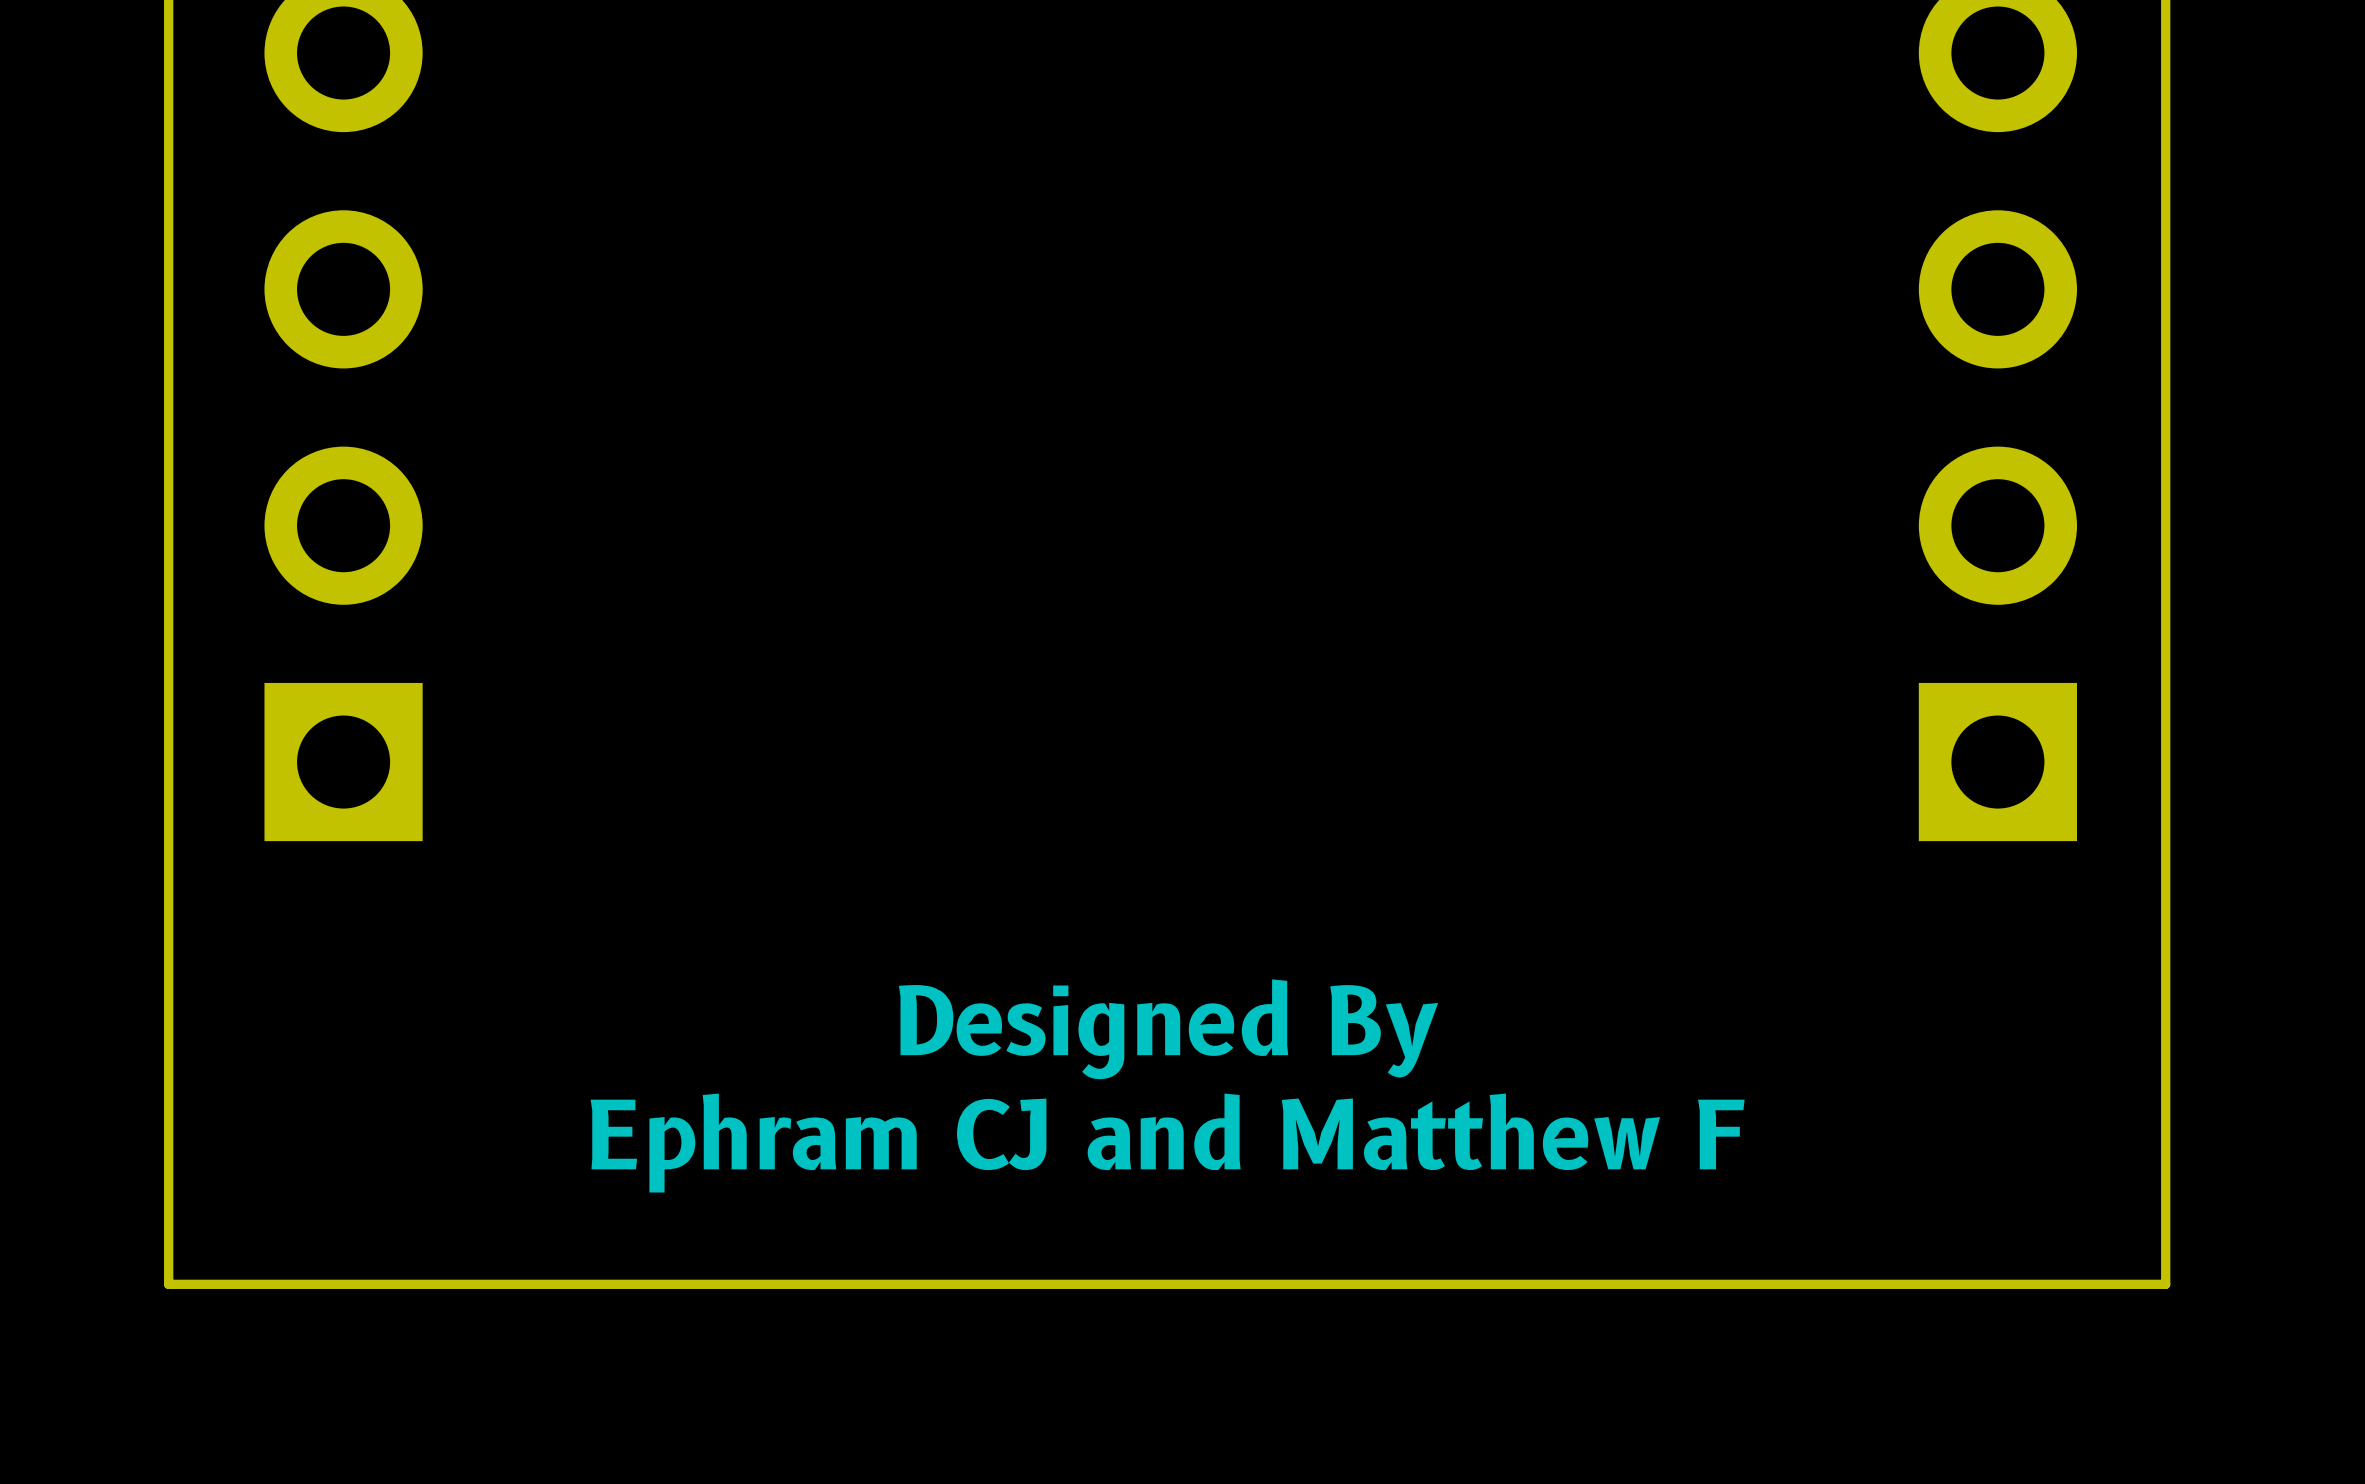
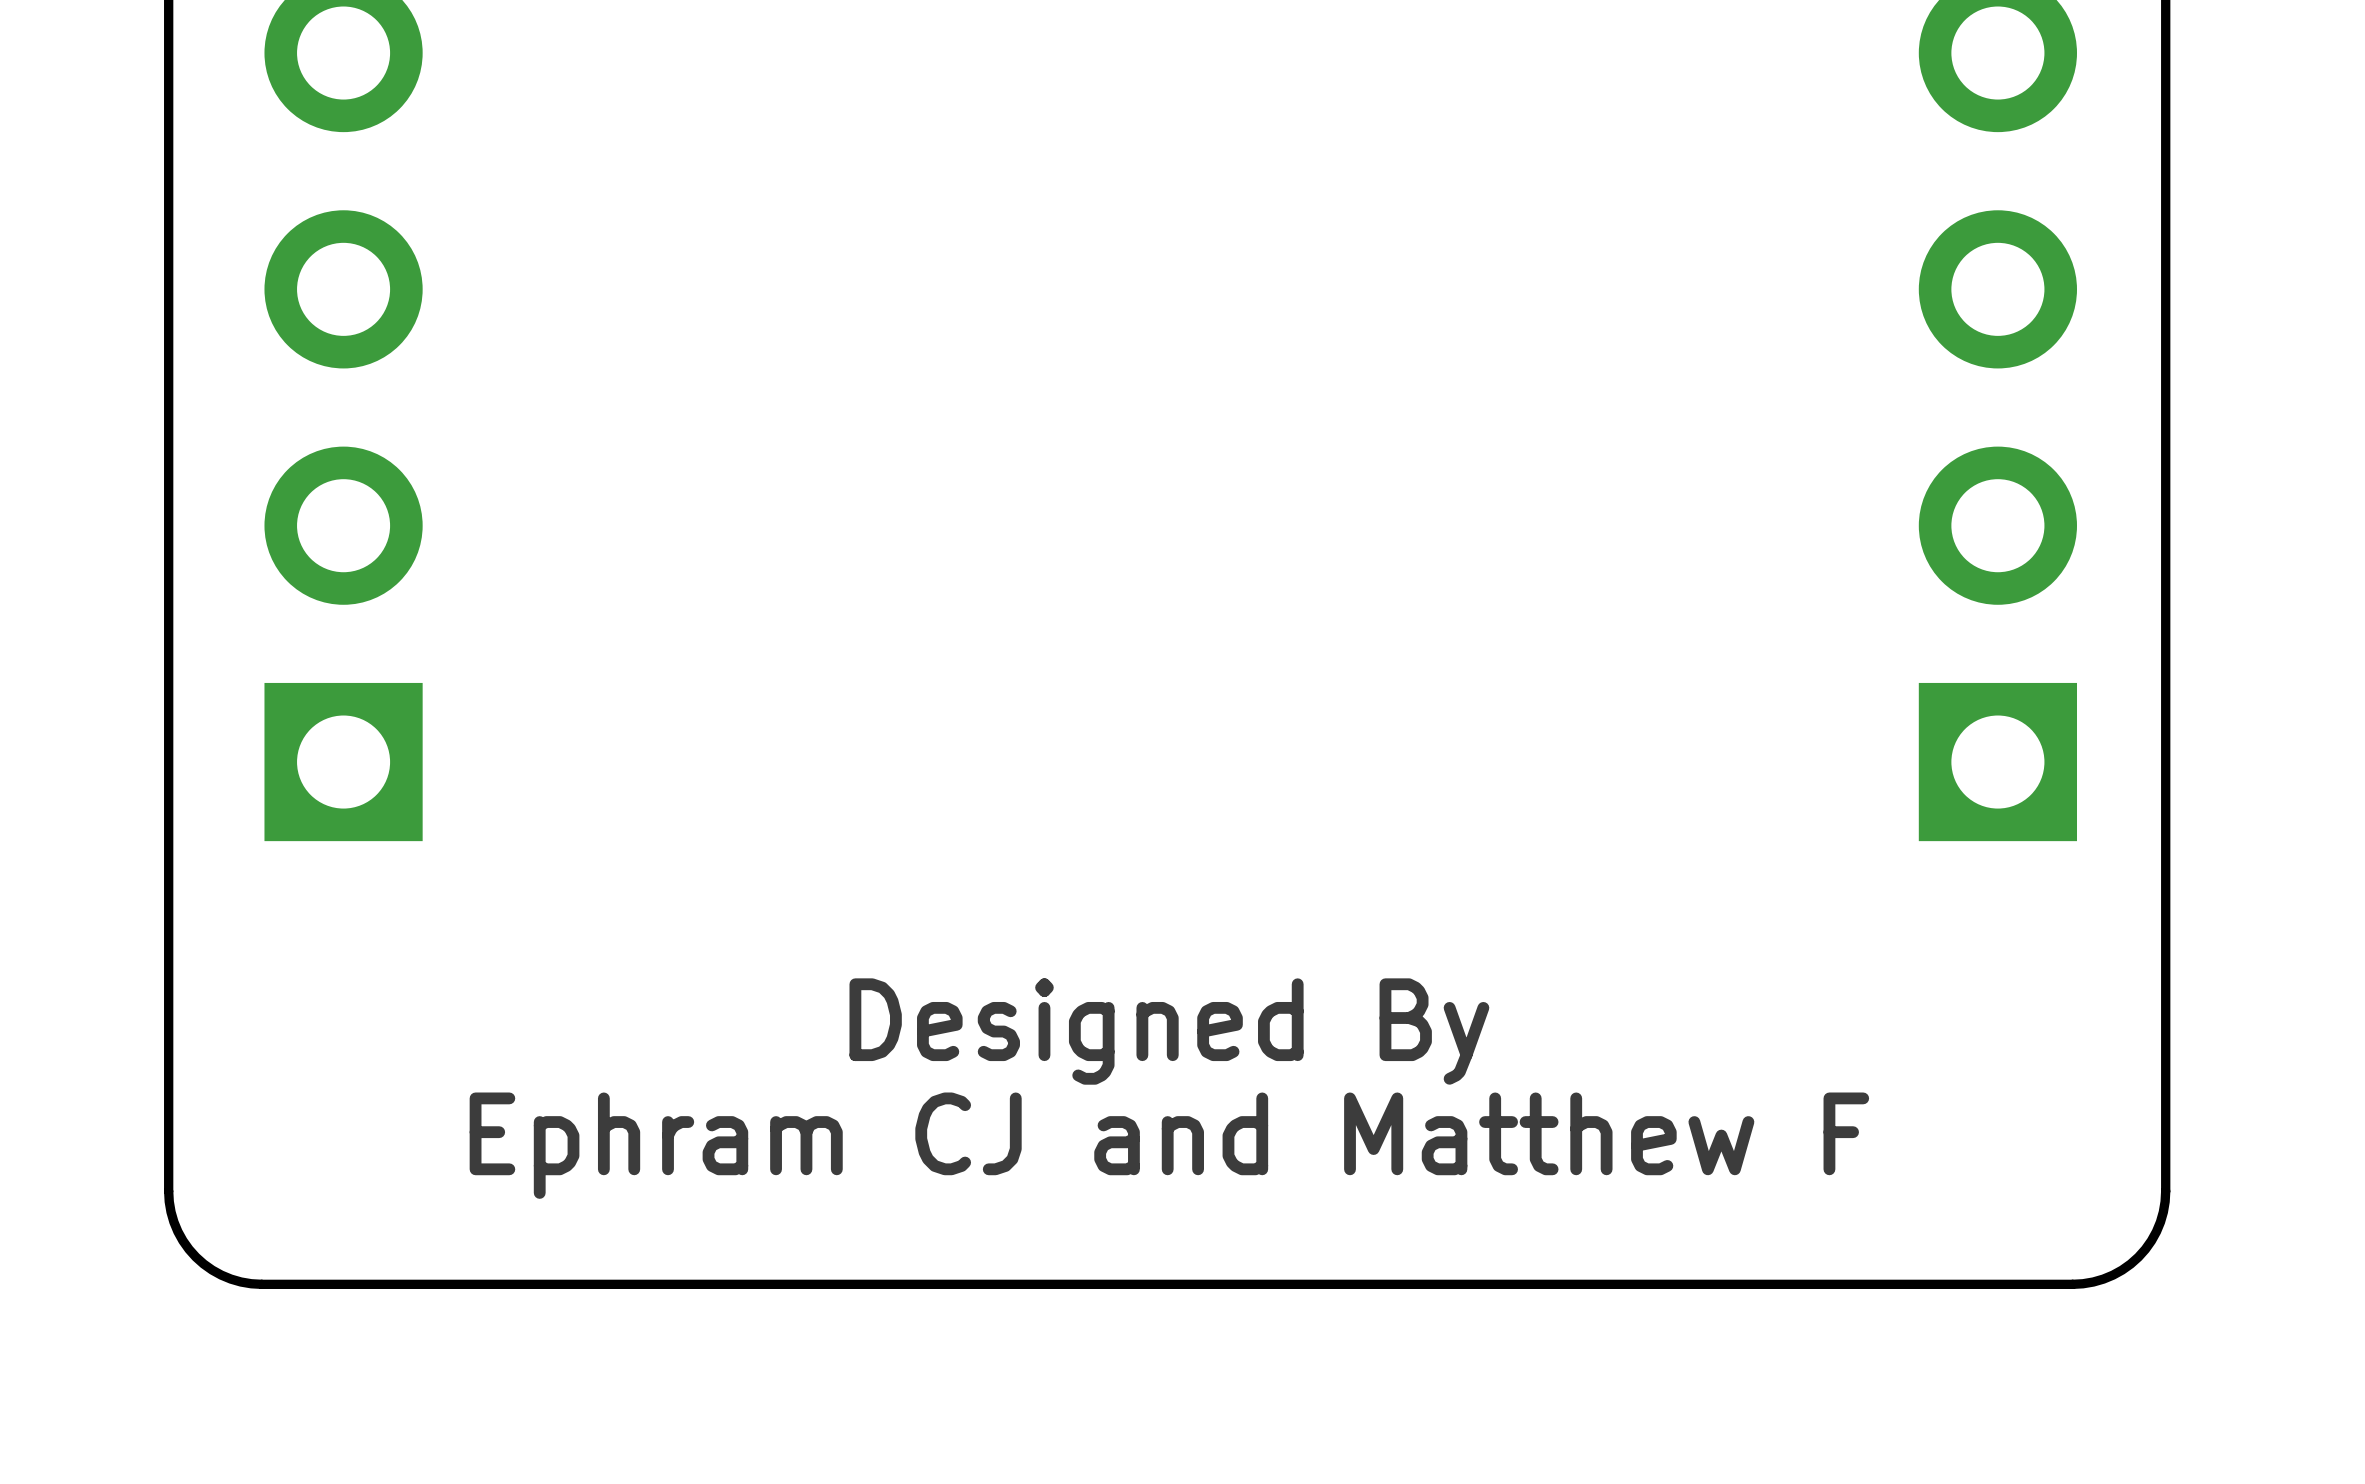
board edge: (168, 1191) (168, 1284) (261, 1284) -> (168, 1191) (173, 1222) (182, 1240) (195, 1257) (212, 1270) (230, 1279) (261, 1284)
board edge: (2165, 1191) (2165, 1284) (2072, 1284) -> (2165, 1191) (2163, 1211) (2156, 1231) (2138, 1257) (2122, 1270) (2103, 1279) (2072, 1284)

